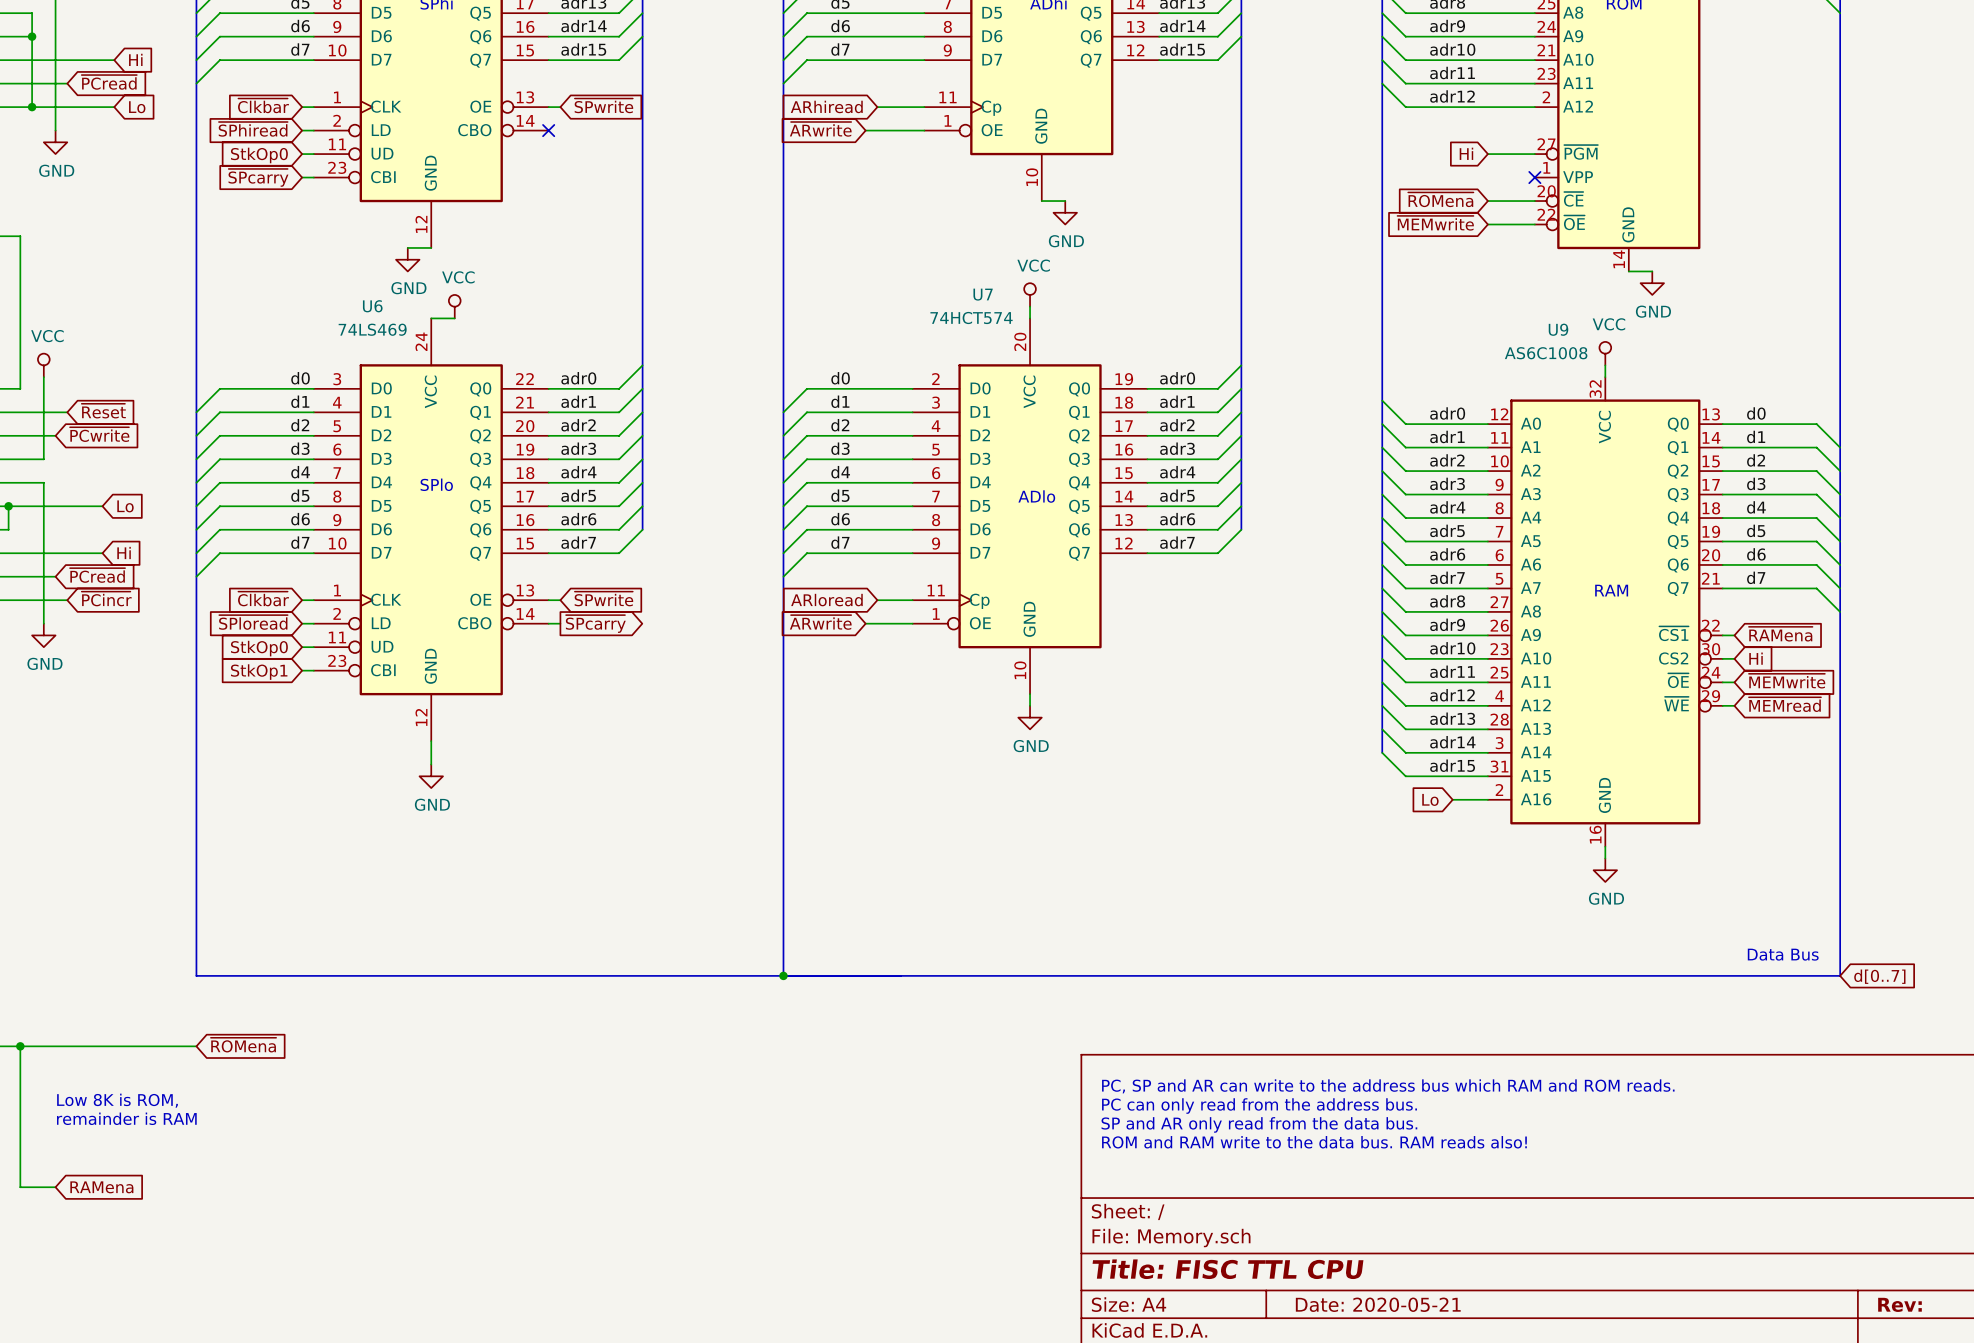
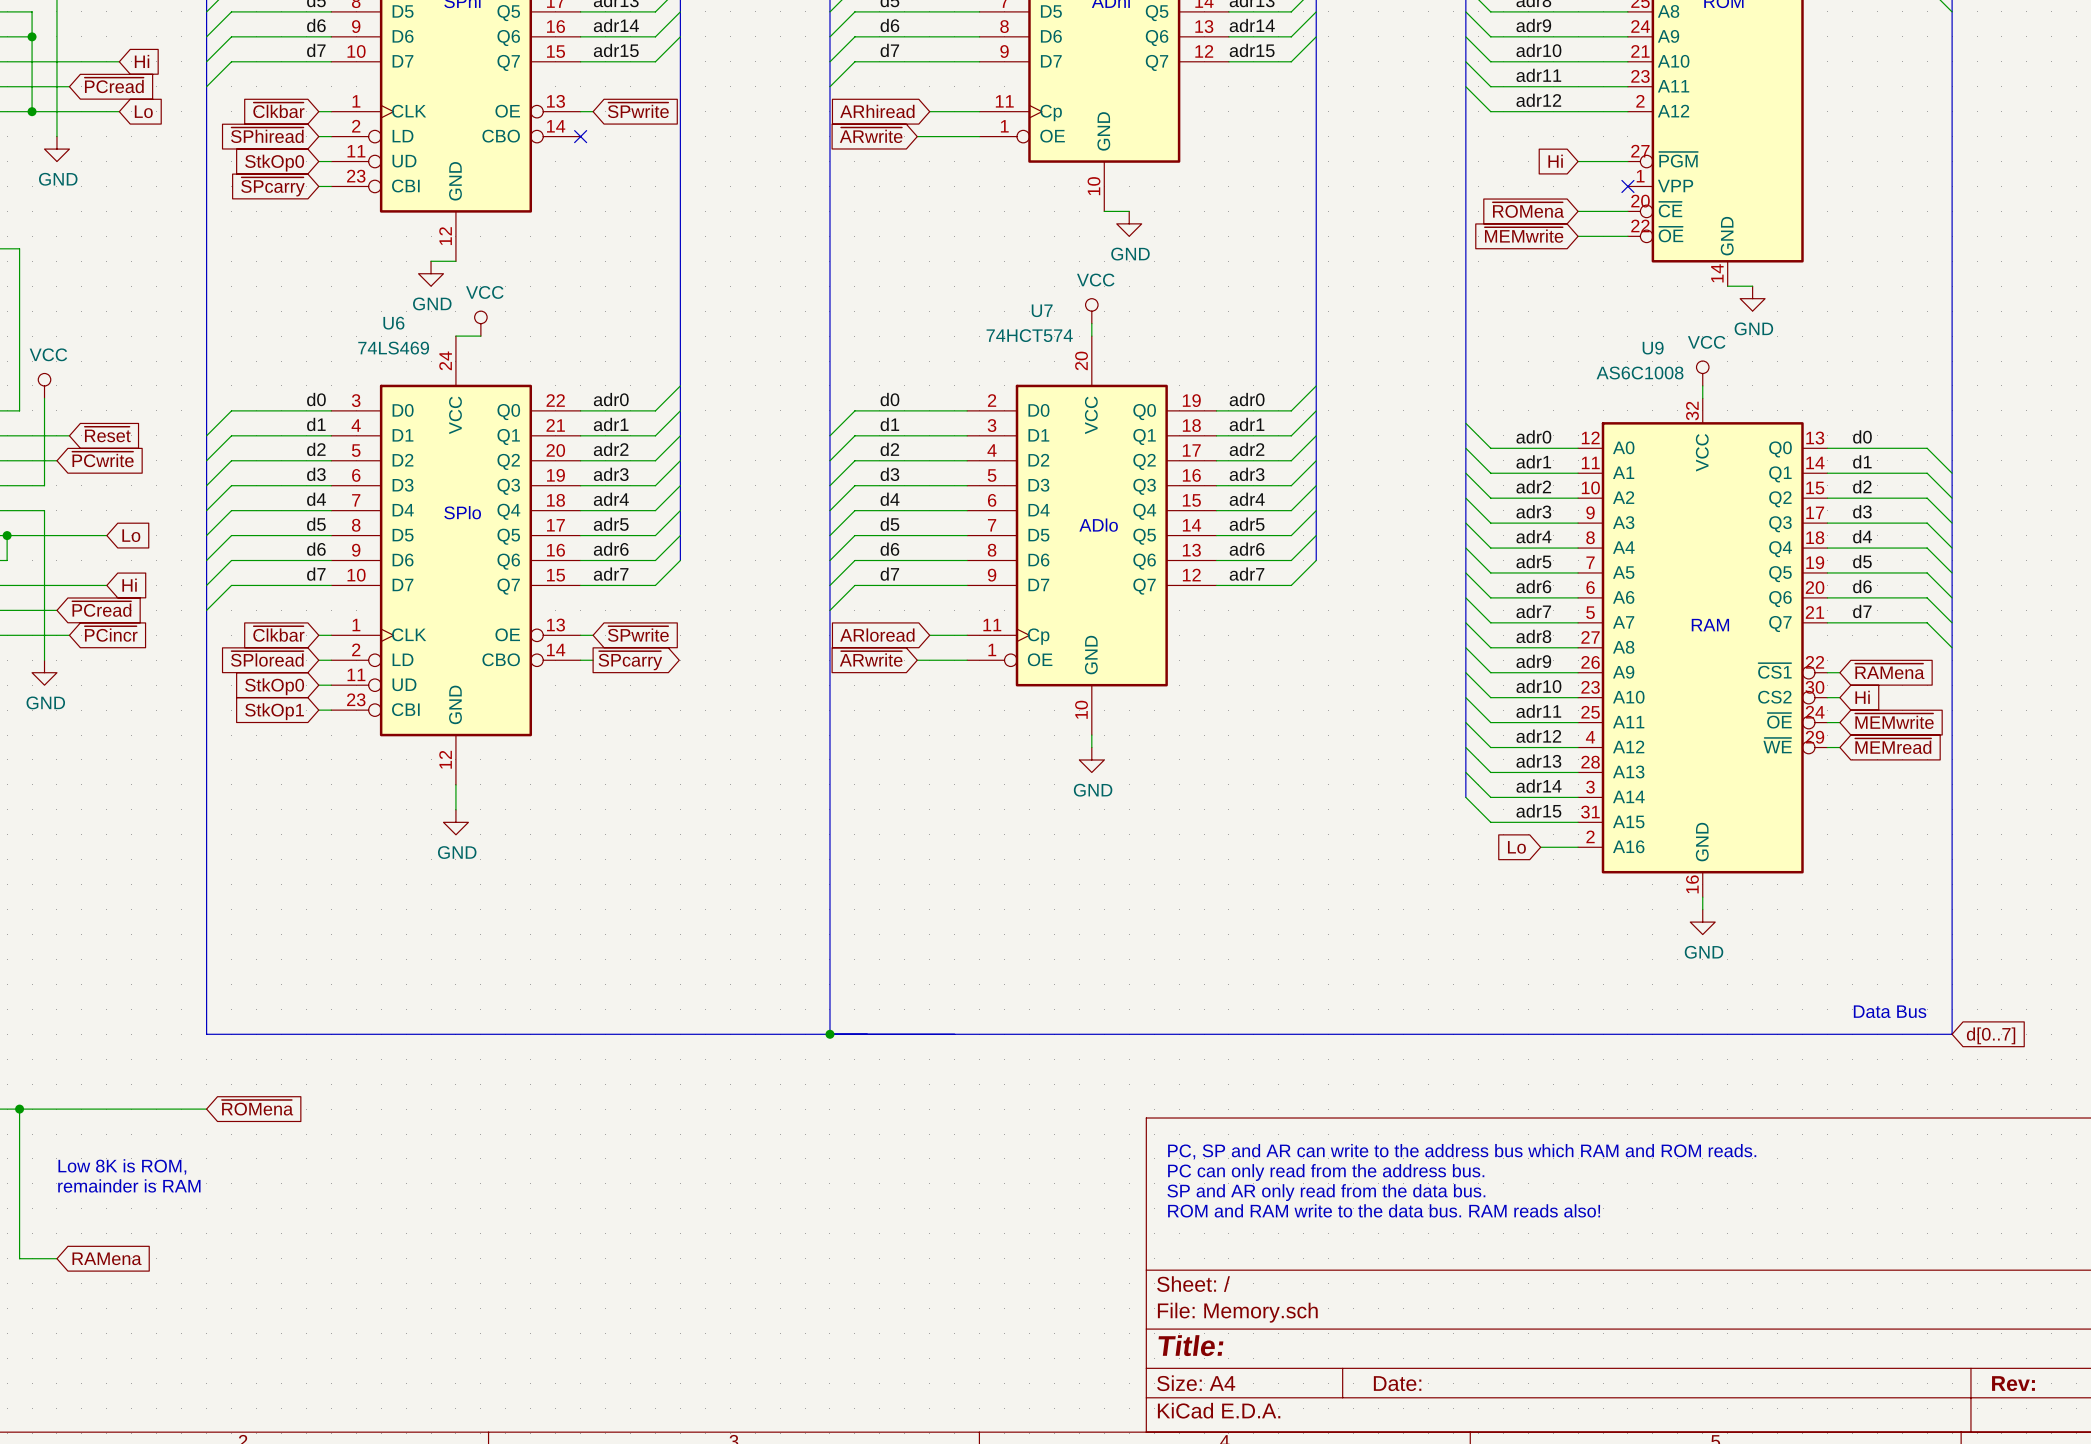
title block: Title: FISC TTL CPU (1228, 1269) -> Title: (1190, 1345)
title block: Date: 2020-05-21 (1378, 1304) -> Date: (1397, 1383)

